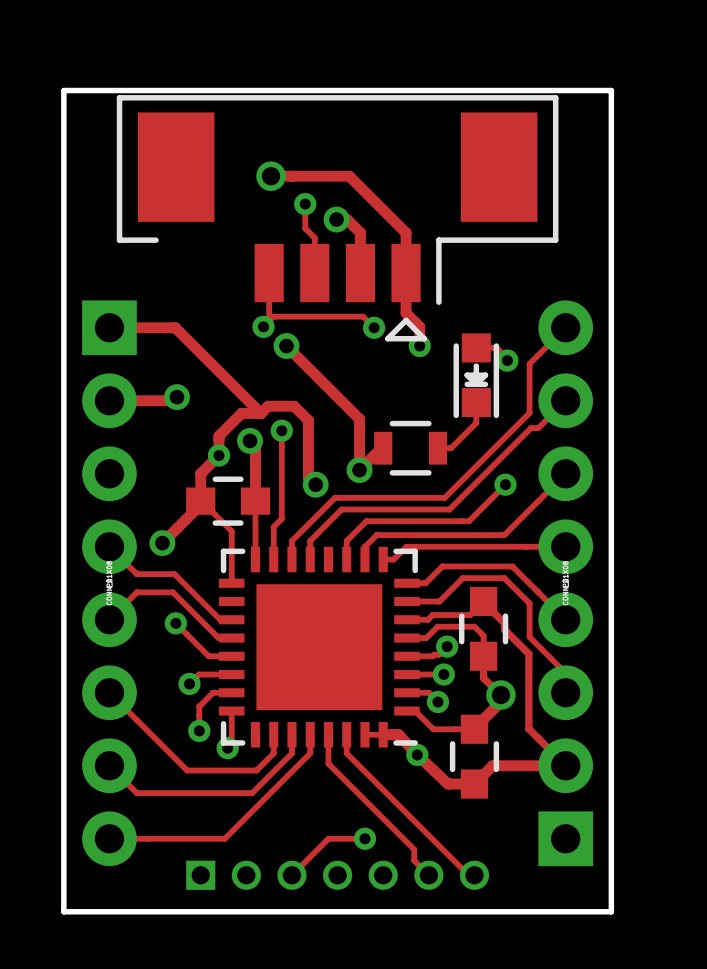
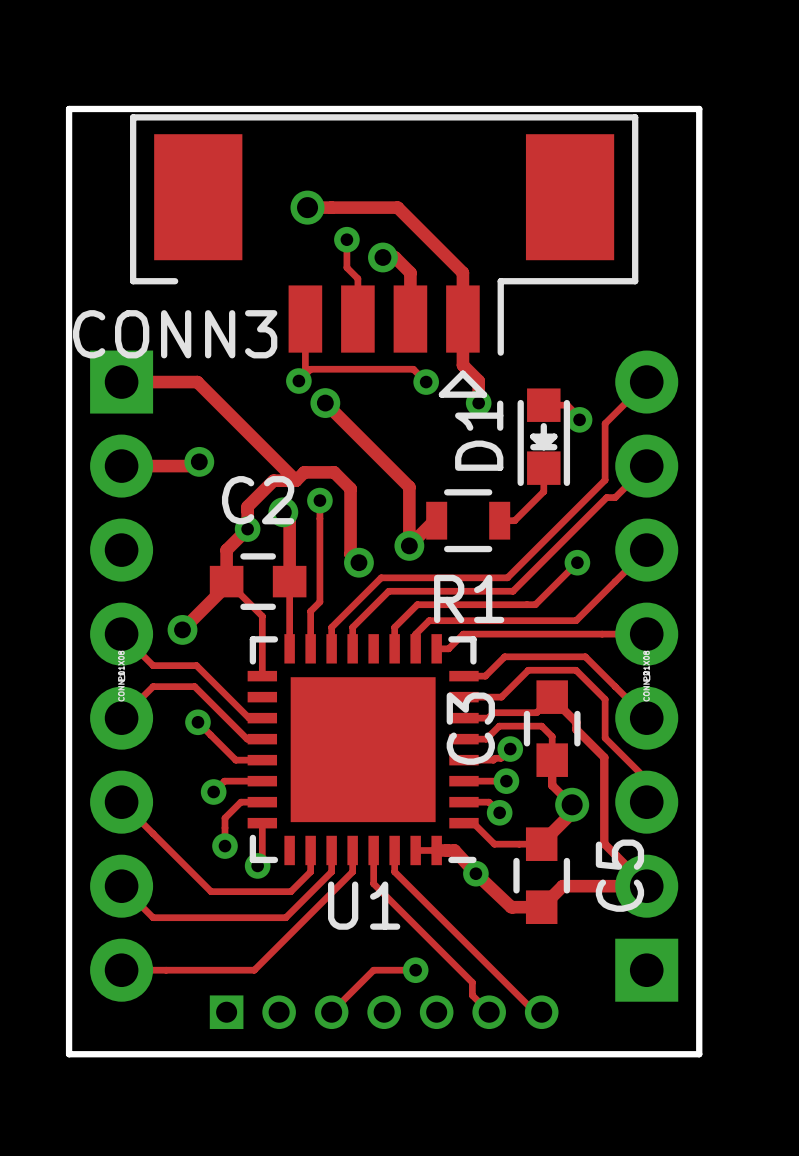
CONN3 name: none -> CONN3 (175, 334)
D1 name: none -> D1 (479, 435)
C2 name: none -> C2 (258, 500)
R1 name: none -> R1 (469, 598)
C3 name: none -> C3 (470, 728)
C5 name: none -> C5 (619, 875)
U1 name: none -> U1 (364, 905)

